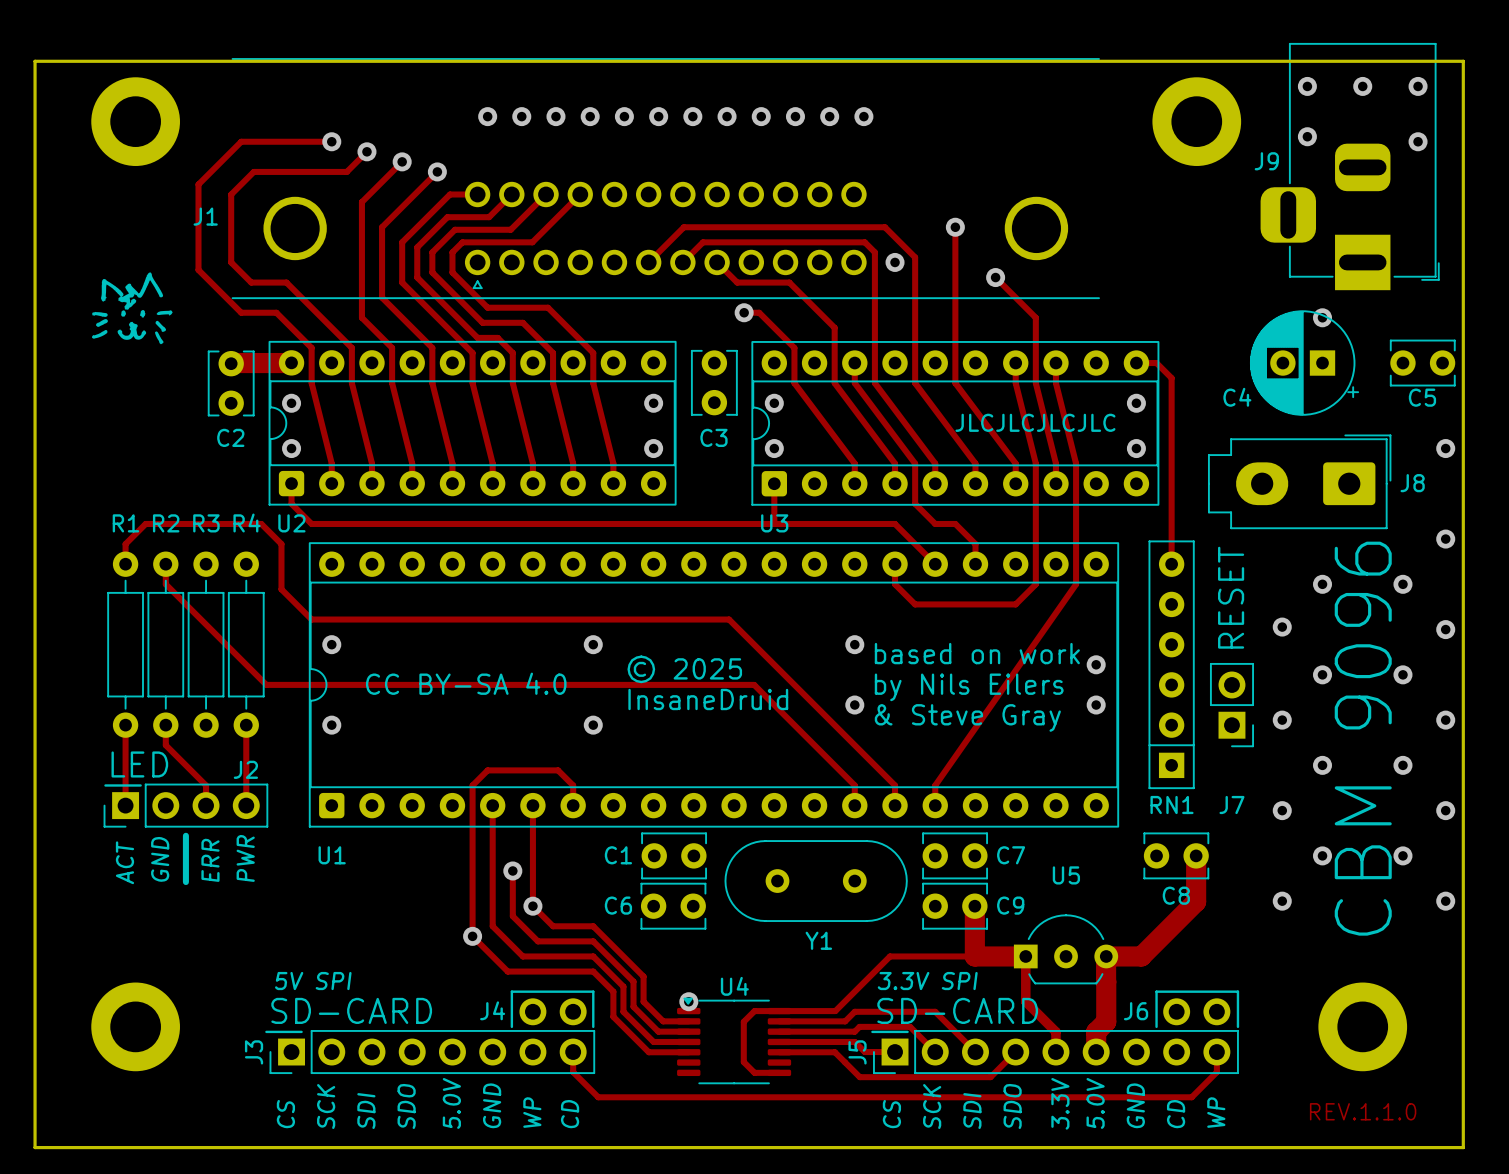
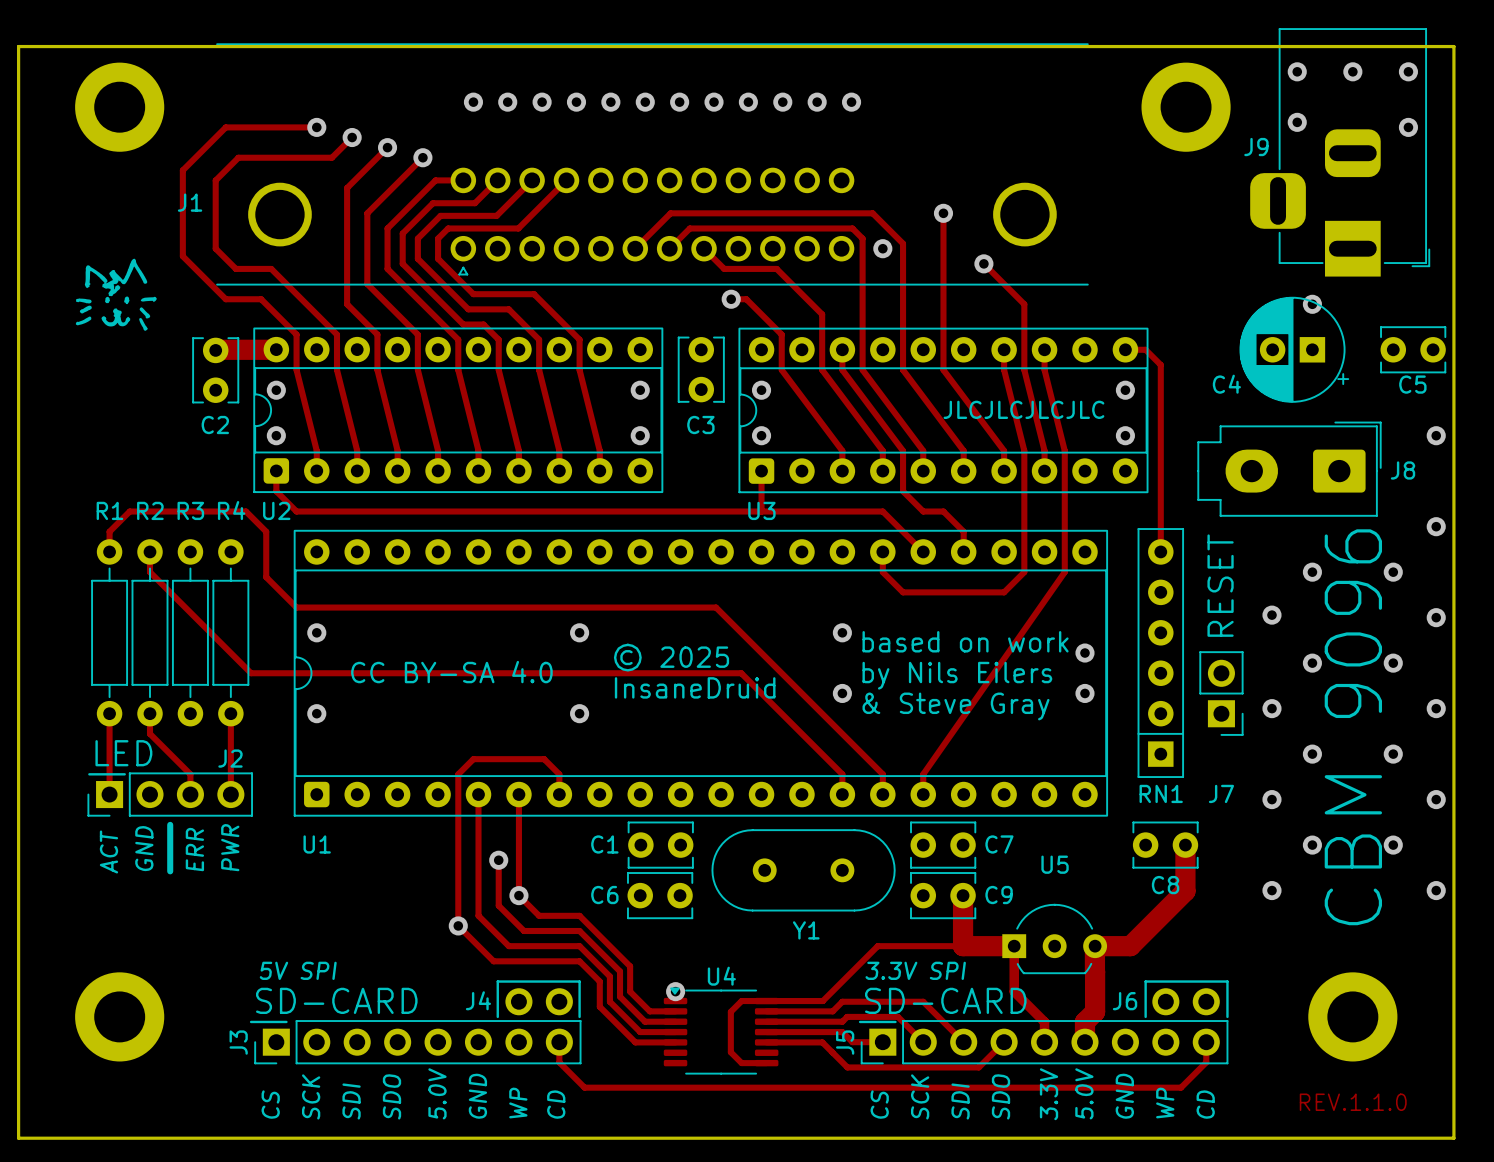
text: WP (1216, 1112) -> CD (1205, 1104)
text: CD (1176, 1114) -> WP (1165, 1103)

